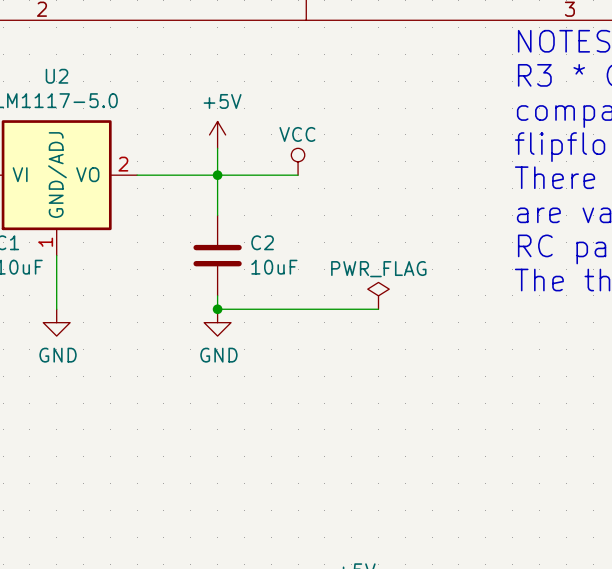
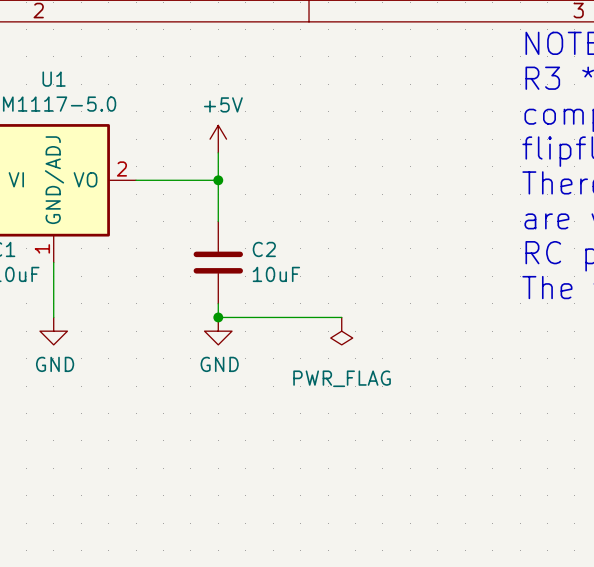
U2 name: U2 (57, 76) -> U1 (54, 79)
power symbol: VCC (298, 161) -> none
wire: (217, 175) (298, 175) -> none
power symbol rotation: 0° (378, 295) -> 180° (341, 331)
power symbol position: PWR_FLAG (378, 295) -> PWR_FLAG (341, 331)
wire: (338, 309) (378, 309) -> none

